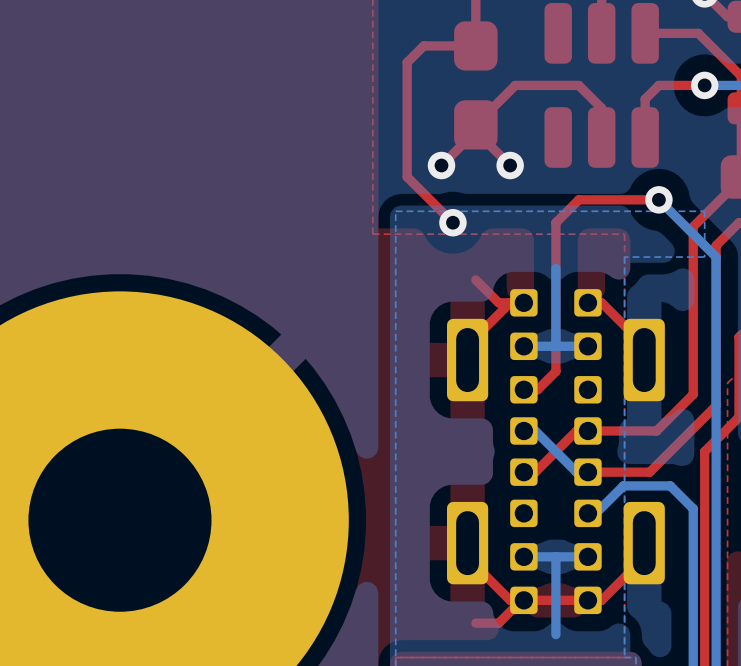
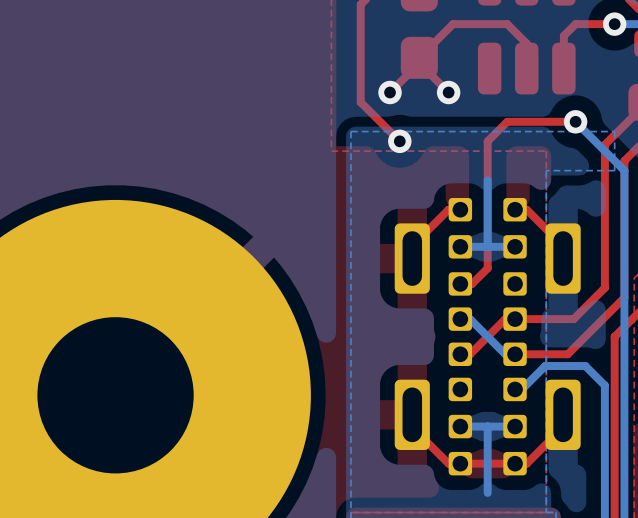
top track: (475, 279) (498, 302) (510, 302) -> none
top track: (521, 600) (498, 623) (475, 623) -> none

